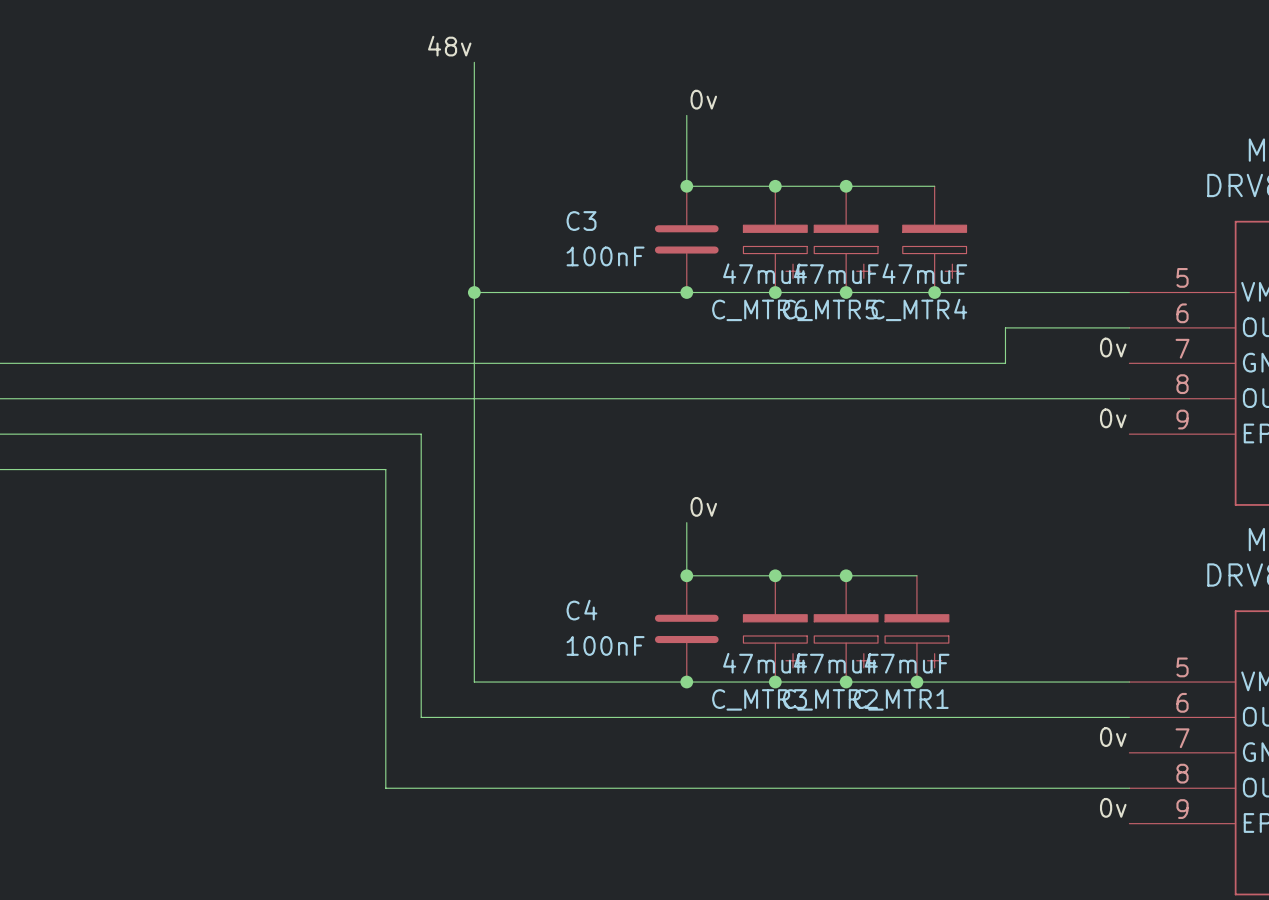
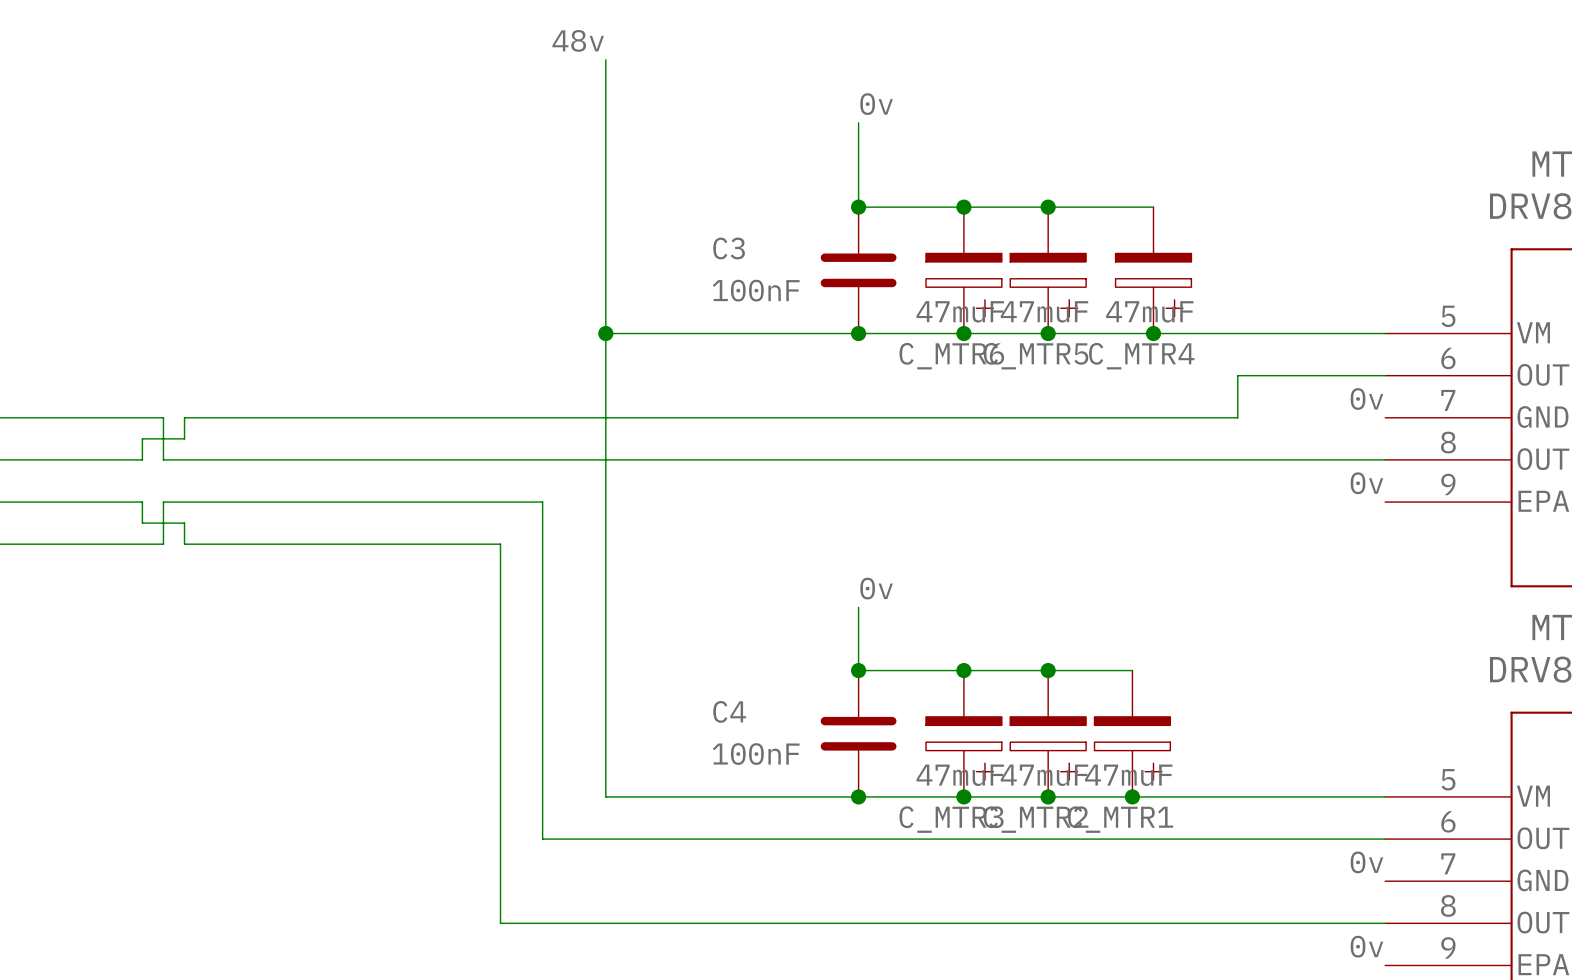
wire: (102, 363) (120, 363) -> (142, 459) (142, 438) (184, 438) (184, 417)
wire: (84, 398) (102, 398) -> (163, 417) (163, 459)
wire: (84, 434) (102, 434) -> (163, 544) (163, 502)
wire: (102, 469) (120, 469) -> (142, 502) (142, 523) (184, 523) (184, 544)

